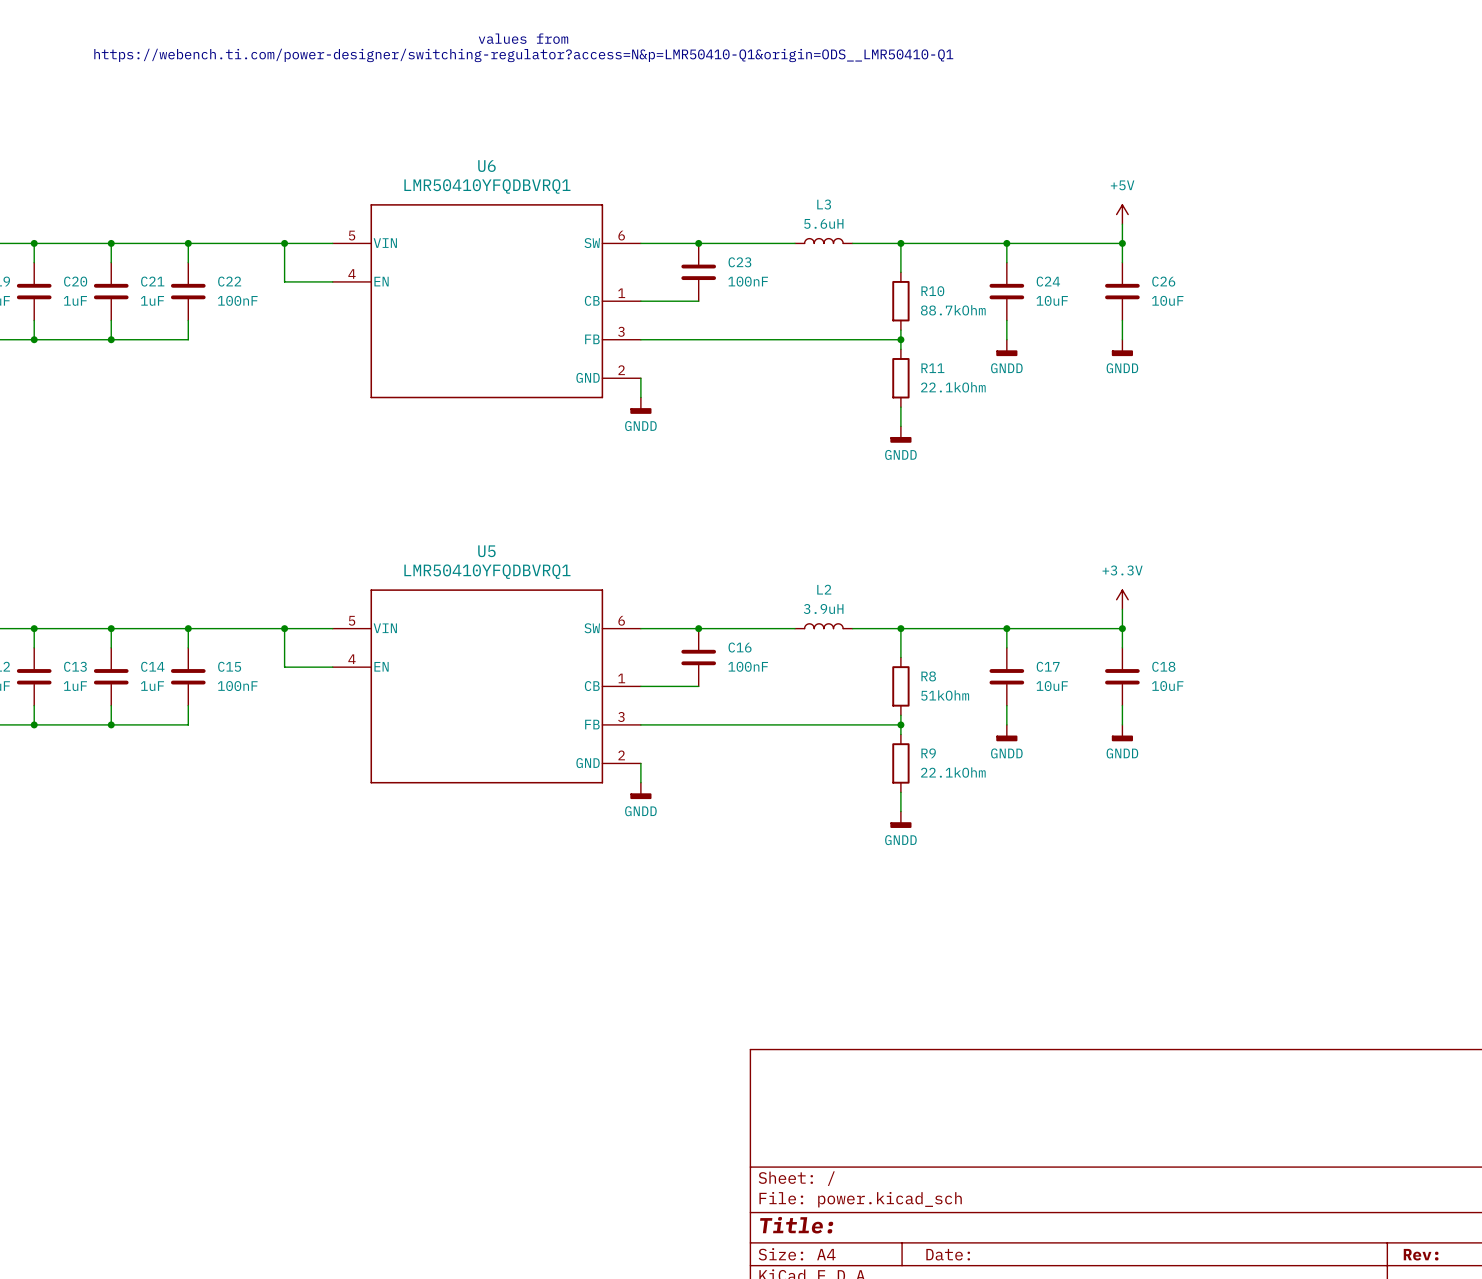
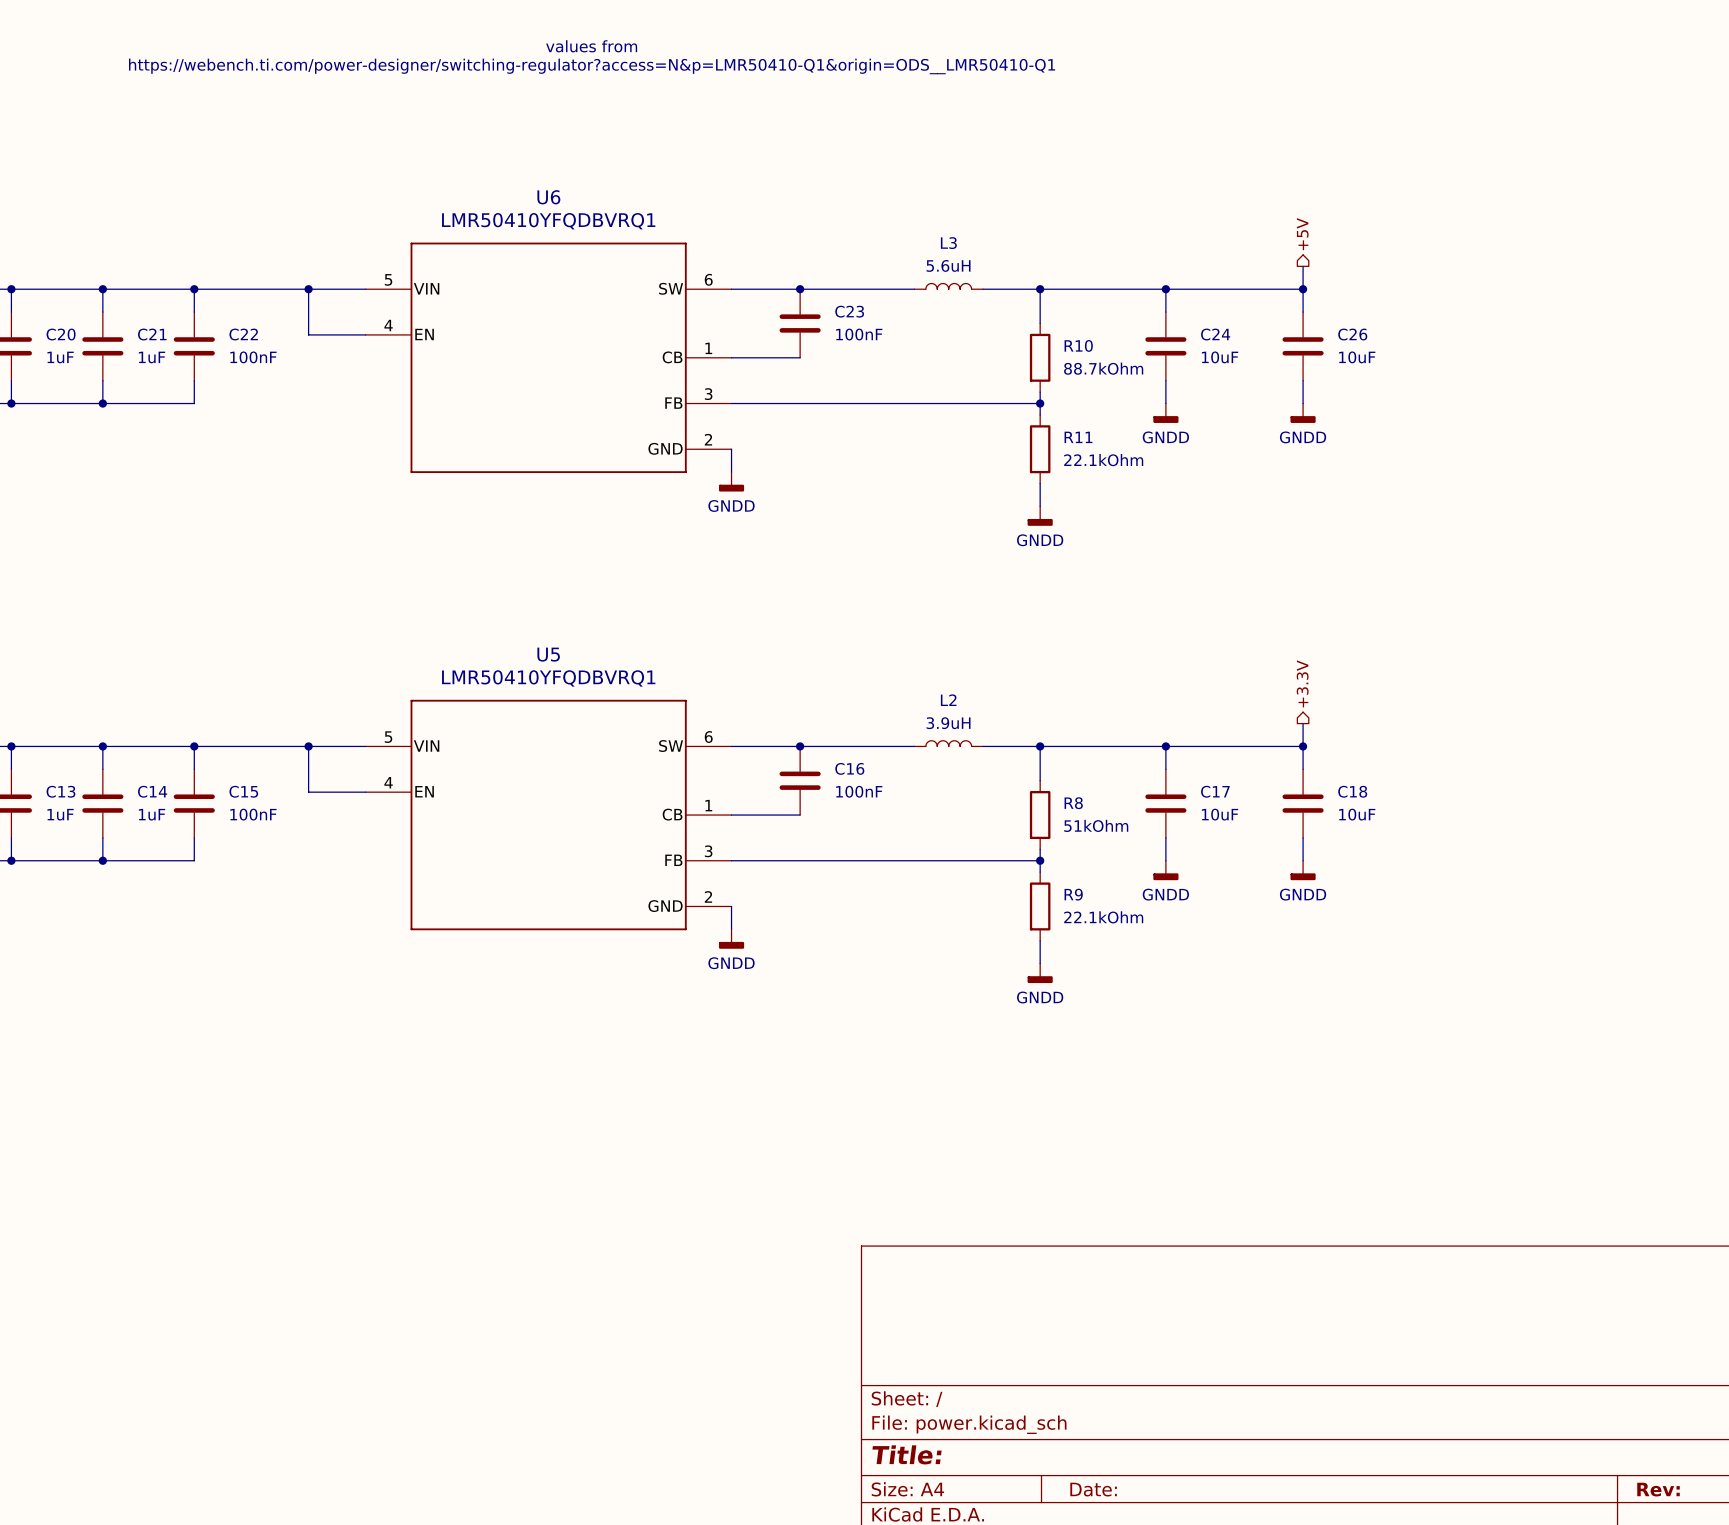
hierarchical label: none -> +5V (1302, 234)
power symbol: +5V (1122, 214) -> none
hierarchical label: none -> +3.3V (1302, 683)
power symbol: +3.3V (1122, 599) -> none

